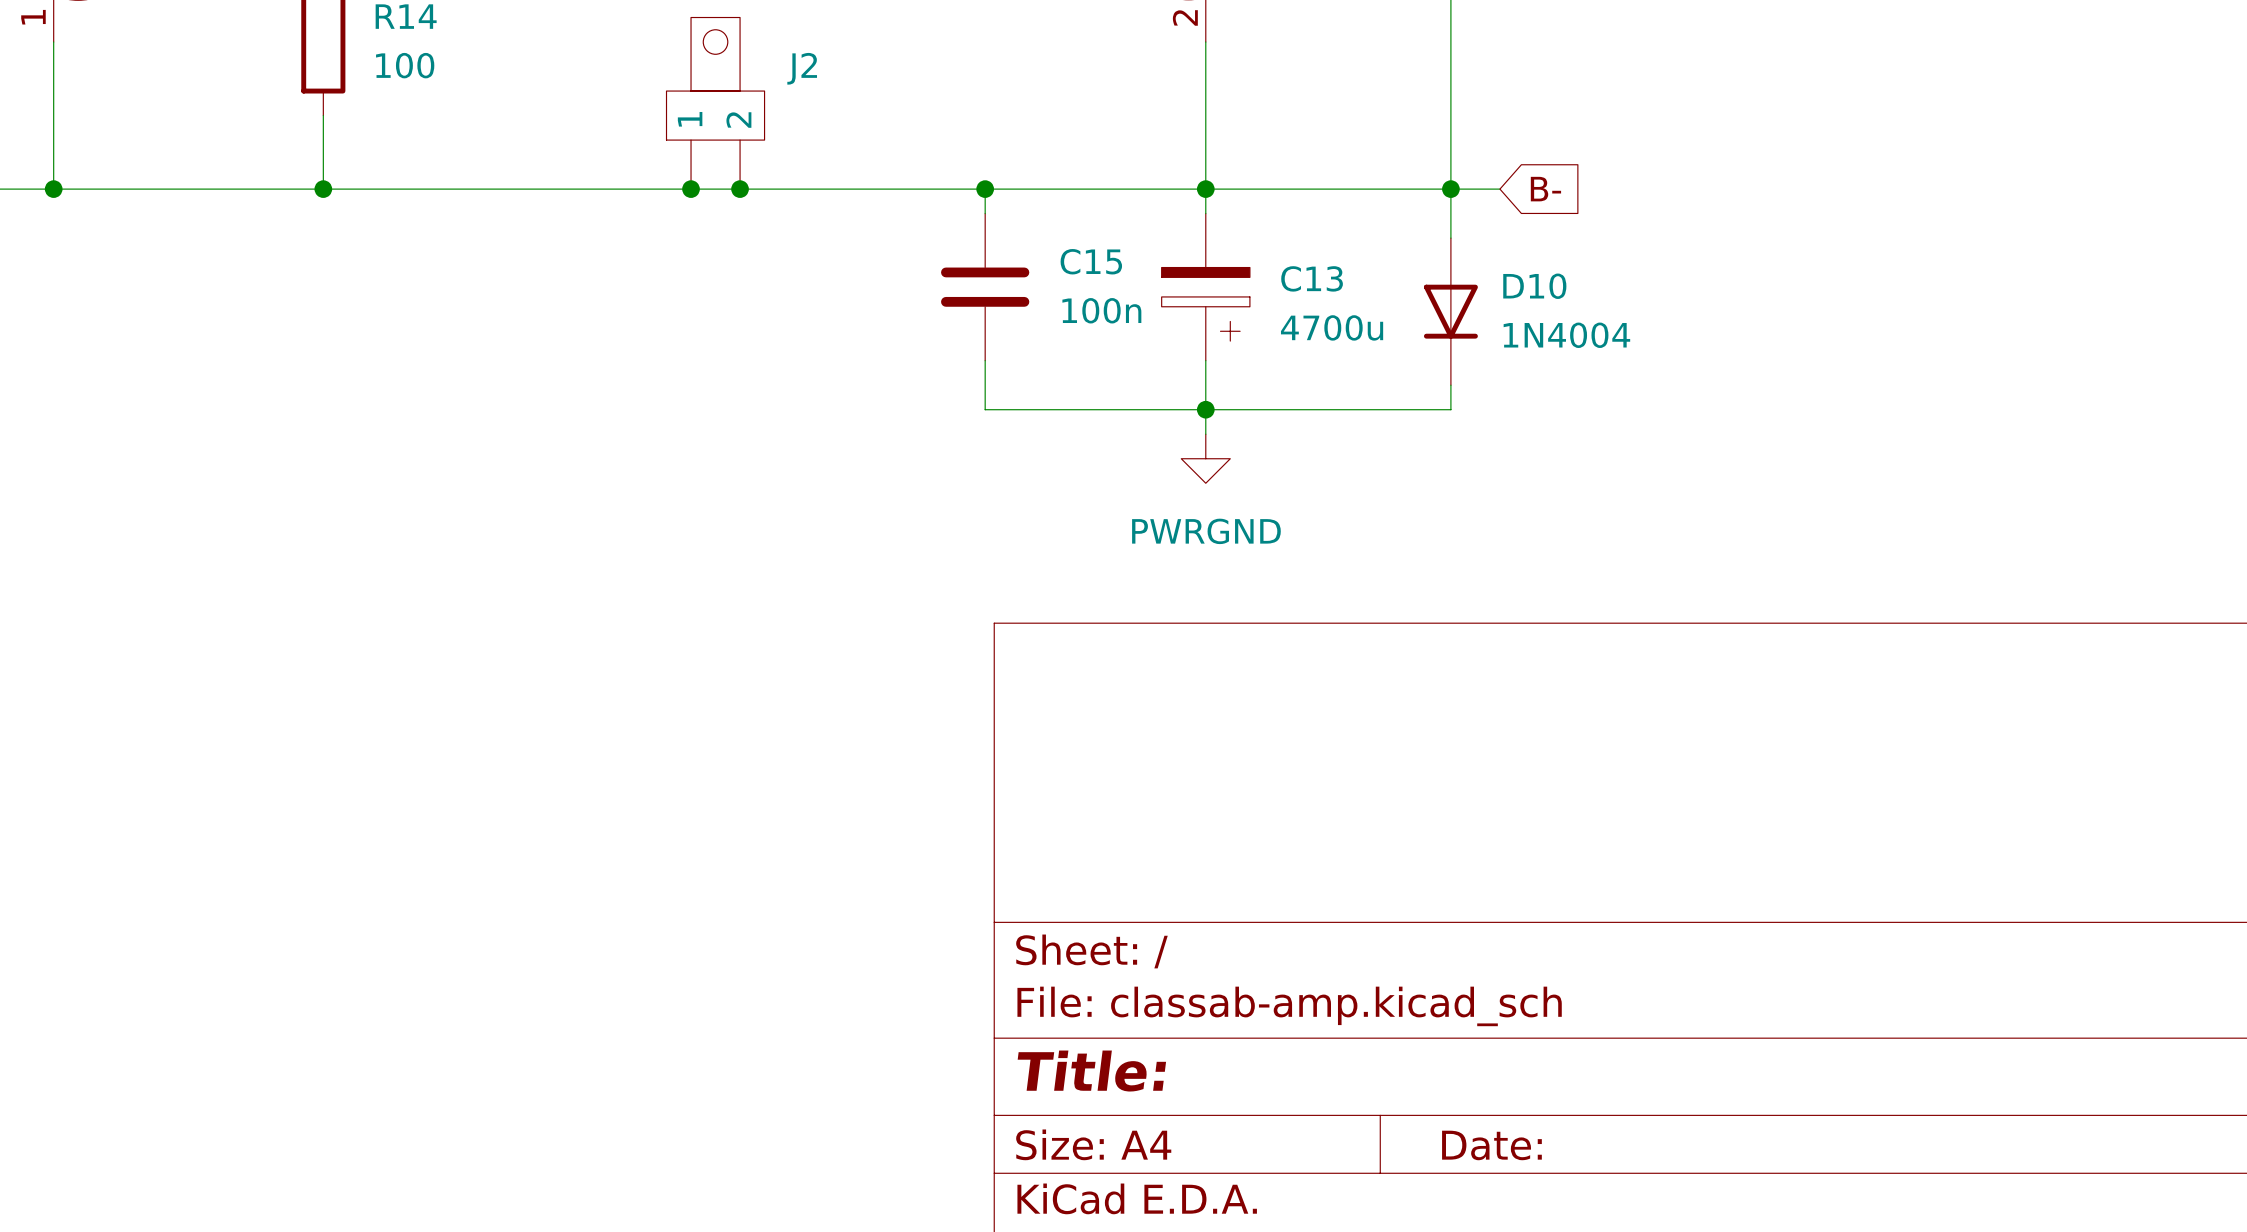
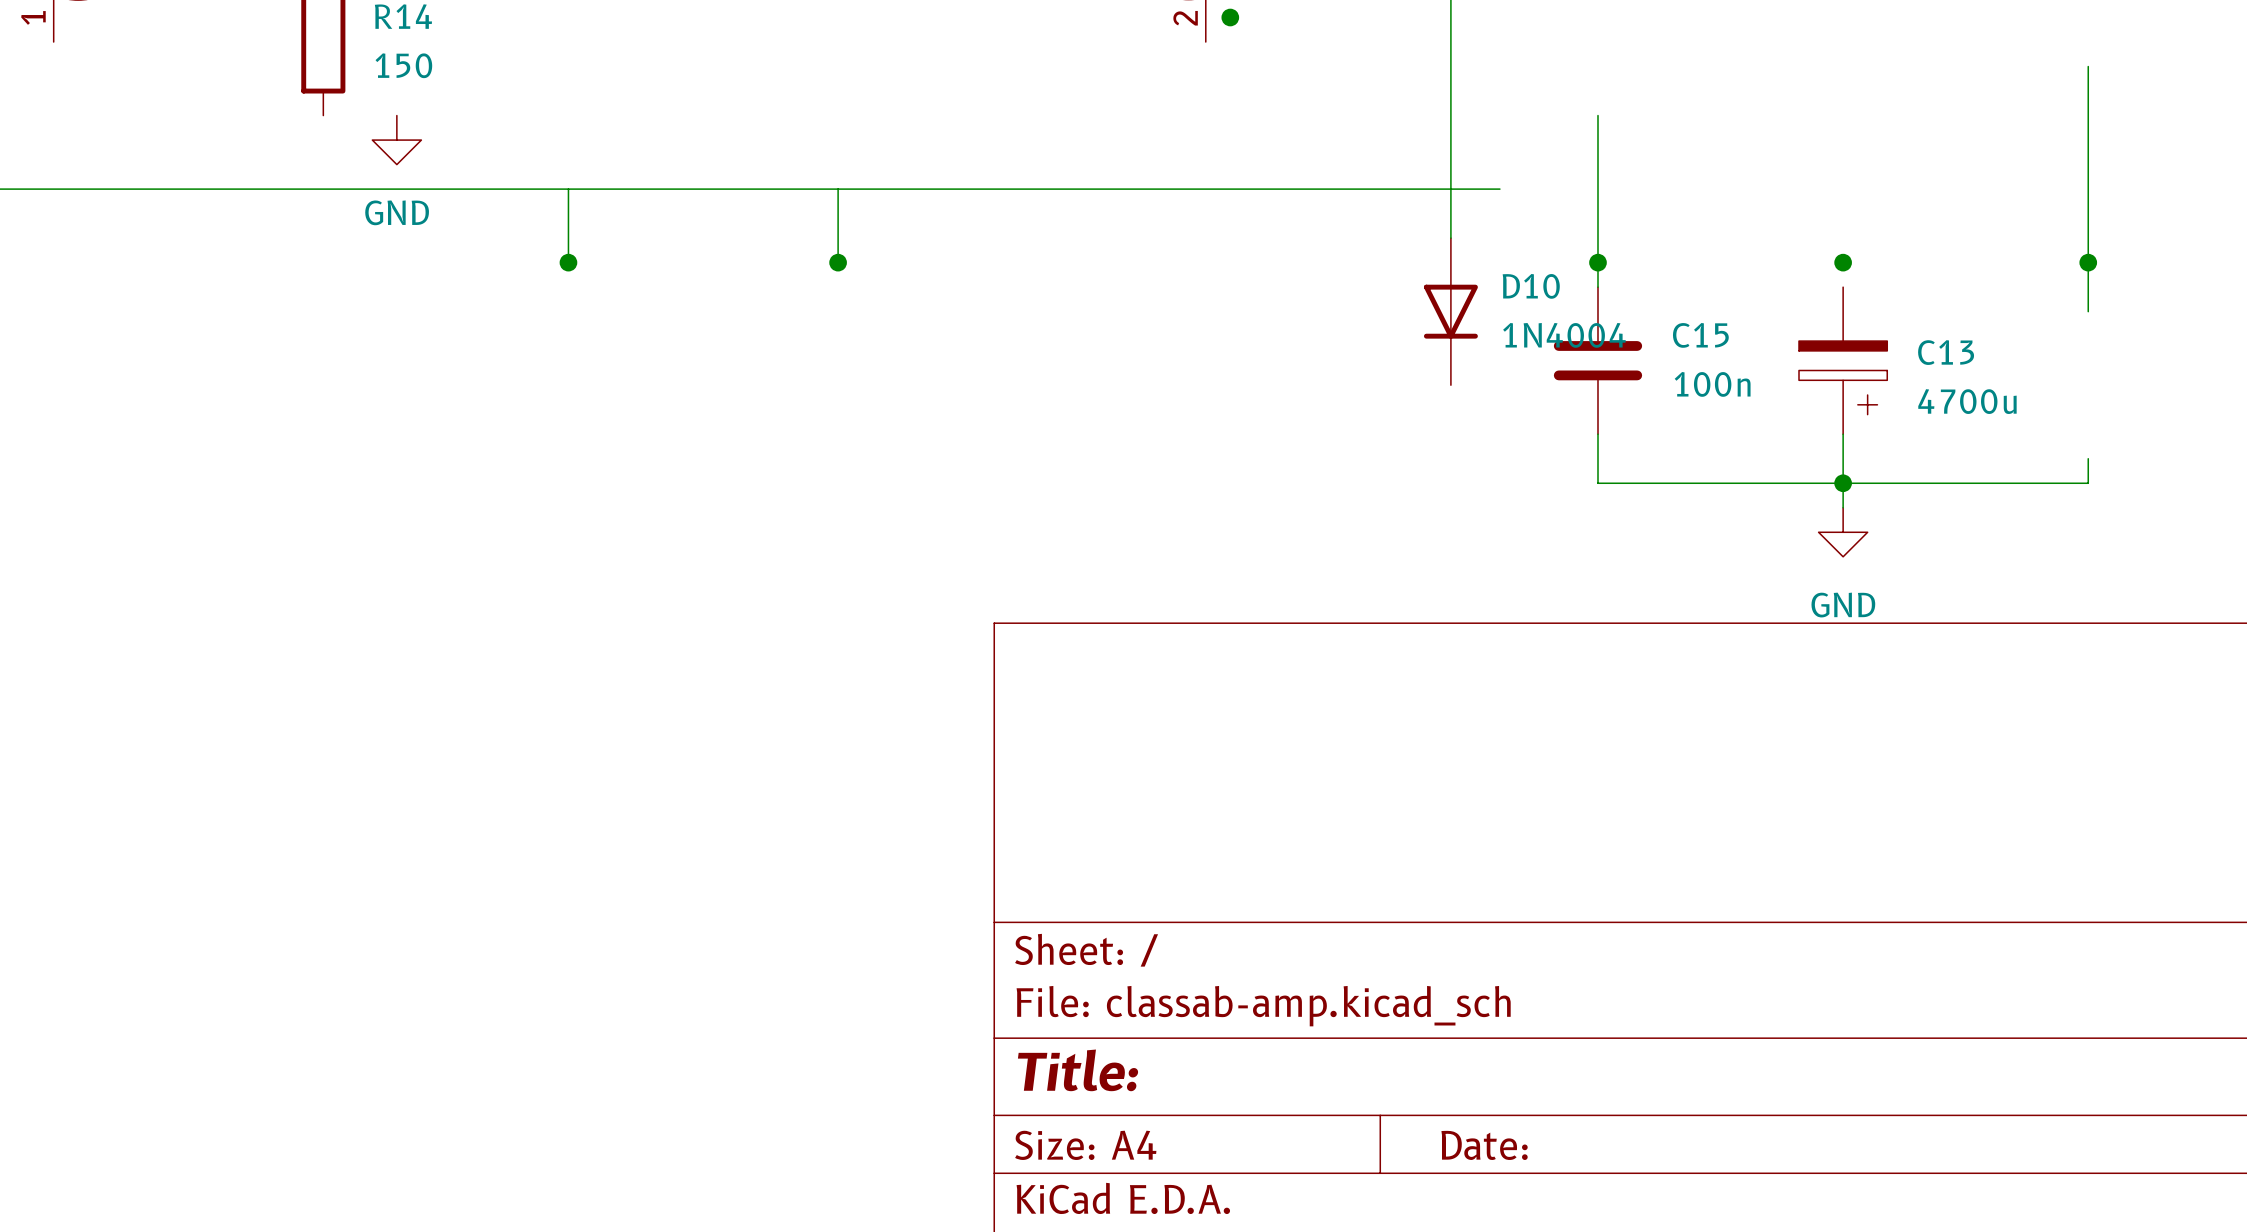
junction: none -> (1230, 17)
wire: (53, 42) (53, 189) -> none
wire: (1205, 42) (1205, 213) -> (1597, 115) (1597, 287)
R14 value: 100 (405, 65) -> 150 (403, 65)
wire: none -> (2088, 66) (2088, 311)
J2: (715, 103) -> none
wire: (323, 115) (323, 189) -> (568, 189) (568, 262)
power symbol: none -> GND (396, 140)
junction: (53, 189) -> none
junction: (323, 189) -> none
junction: (691, 189) -> none
junction: (740, 189) -> none
wire: (985, 189) (985, 213) -> none
junction: (985, 189) -> none
junction: (1205, 189) -> none
junction: (1450, 189) -> none
global label: B- (1545, 189) -> none
junction: none -> (568, 262)
junction: none -> (838, 262)
junction: none -> (1597, 262)
junction: none -> (1843, 262)
junction: none -> (2088, 262)
C15 position: (985, 287) -> (1597, 360)
C13 position: (1205, 287) -> (1843, 360)
wire: (985, 360) (985, 409) (1450, 409) (1450, 385) -> none
wire: (1205, 360) (1205, 434) -> (838, 189) (838, 262)
junction: (1205, 409) -> none
wire: none -> (1597, 434) (1597, 483) (2088, 483) (2088, 458)
wire: none -> (1843, 434) (1843, 507)
power symbol: PWRGND (1205, 458) -> none
junction: none -> (1843, 483)
power symbol: none -> GND (1843, 532)

